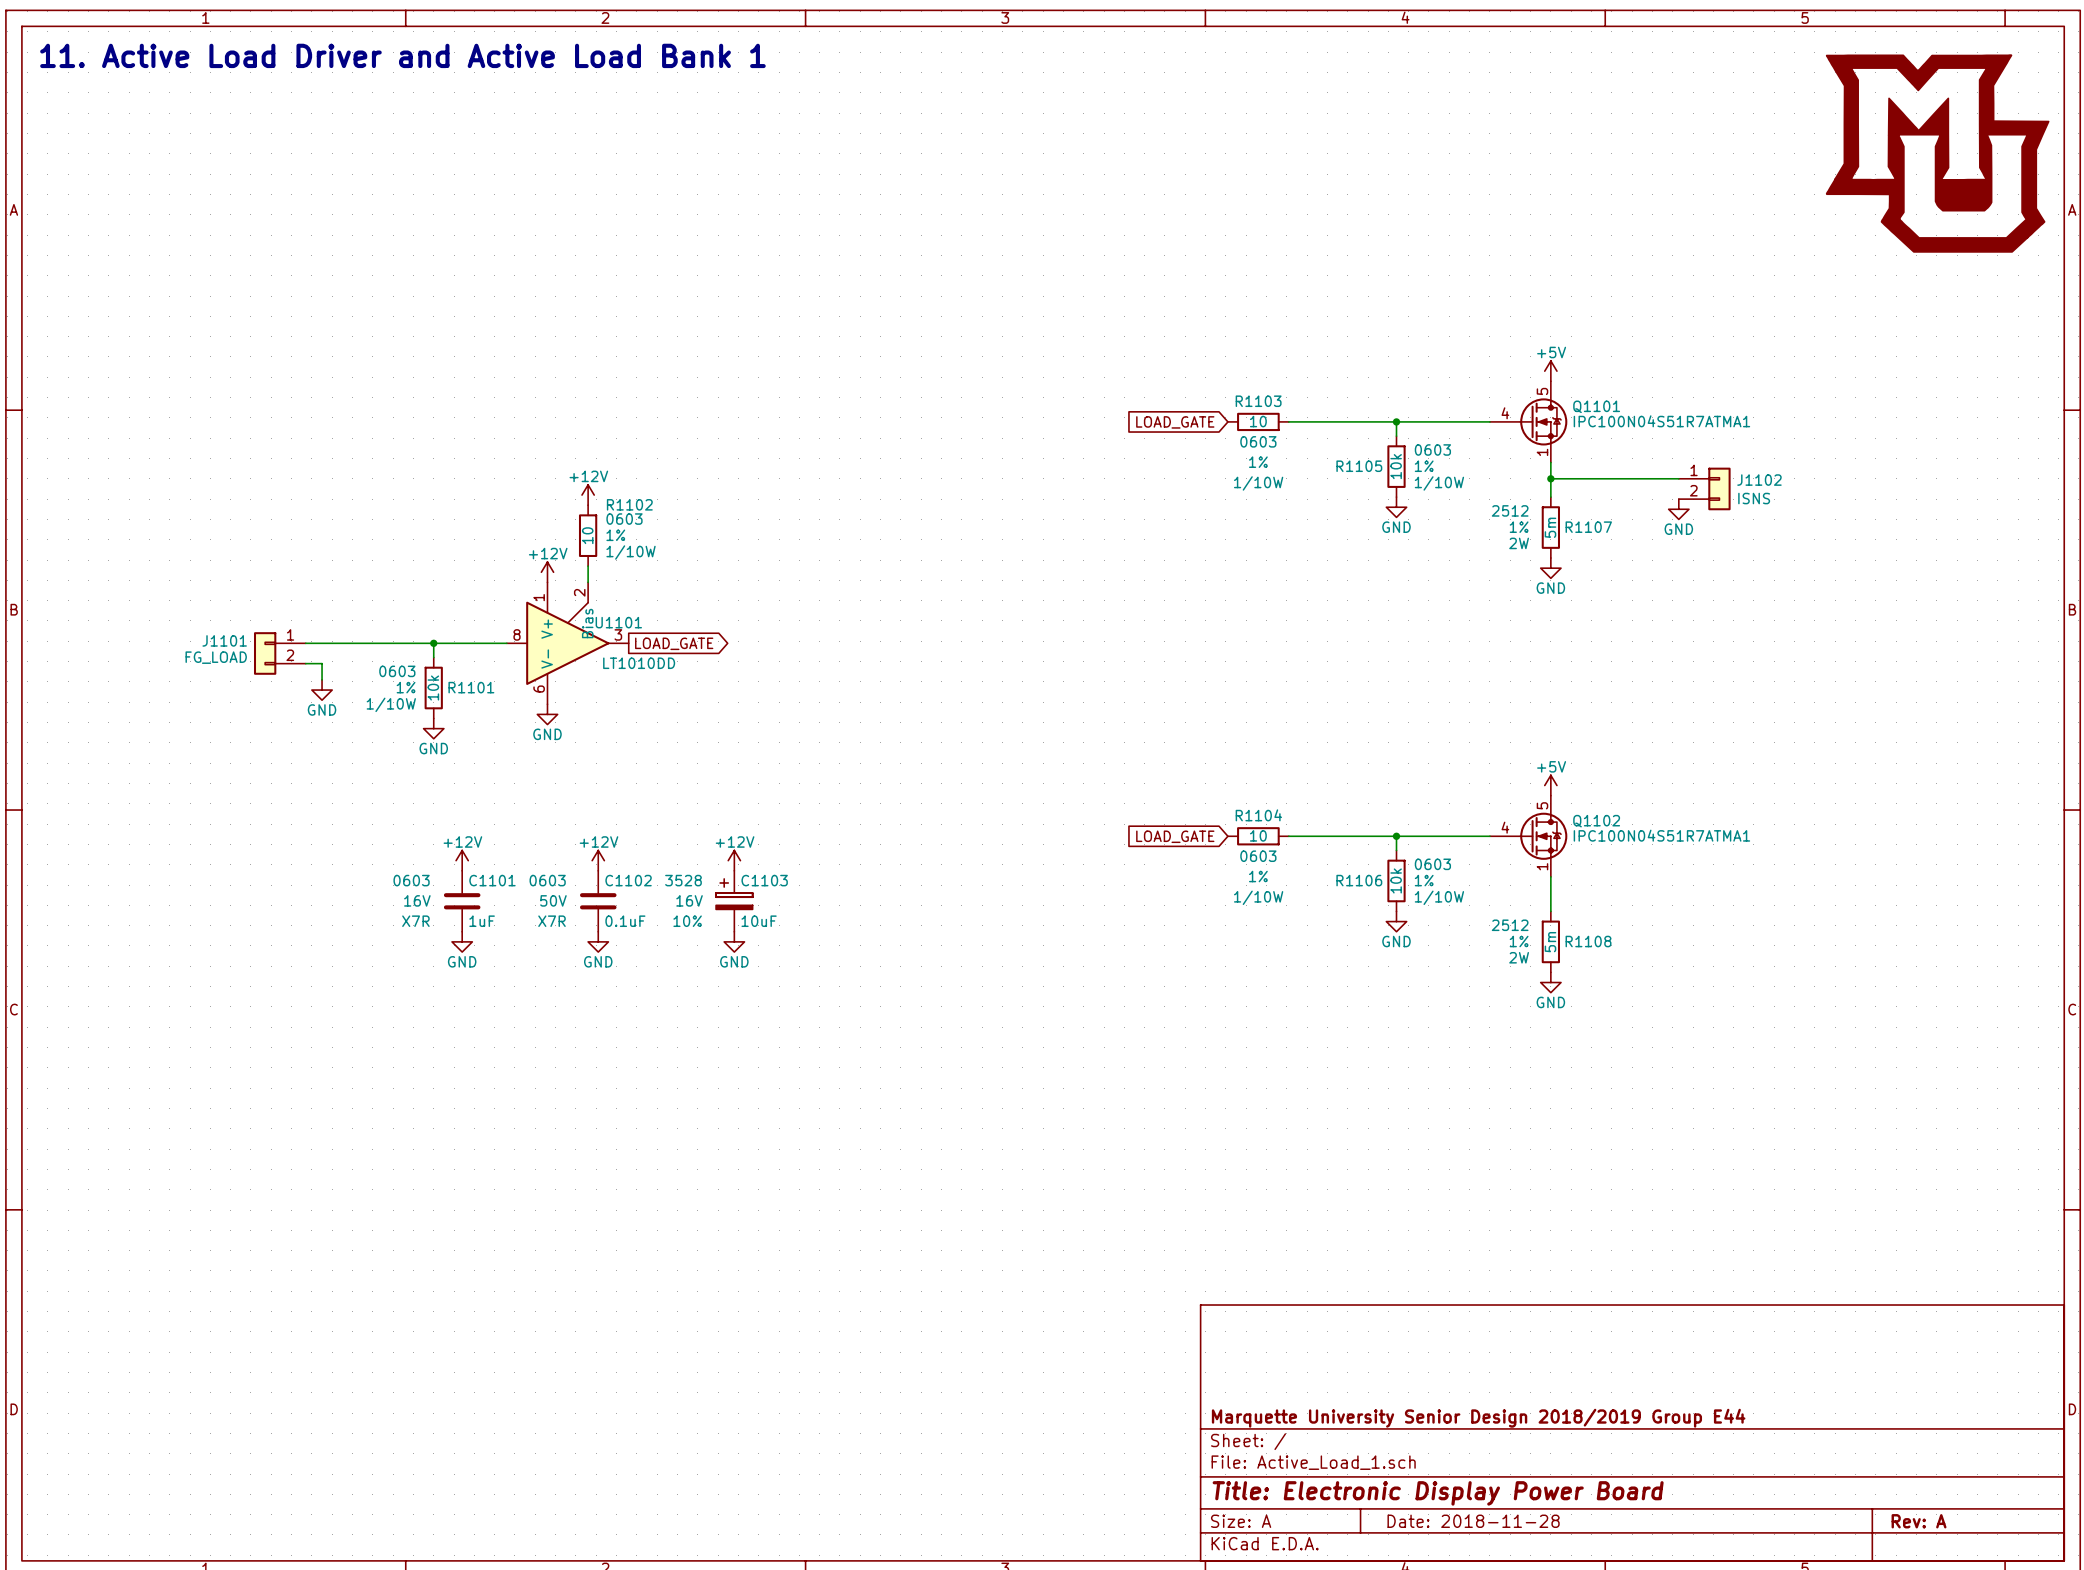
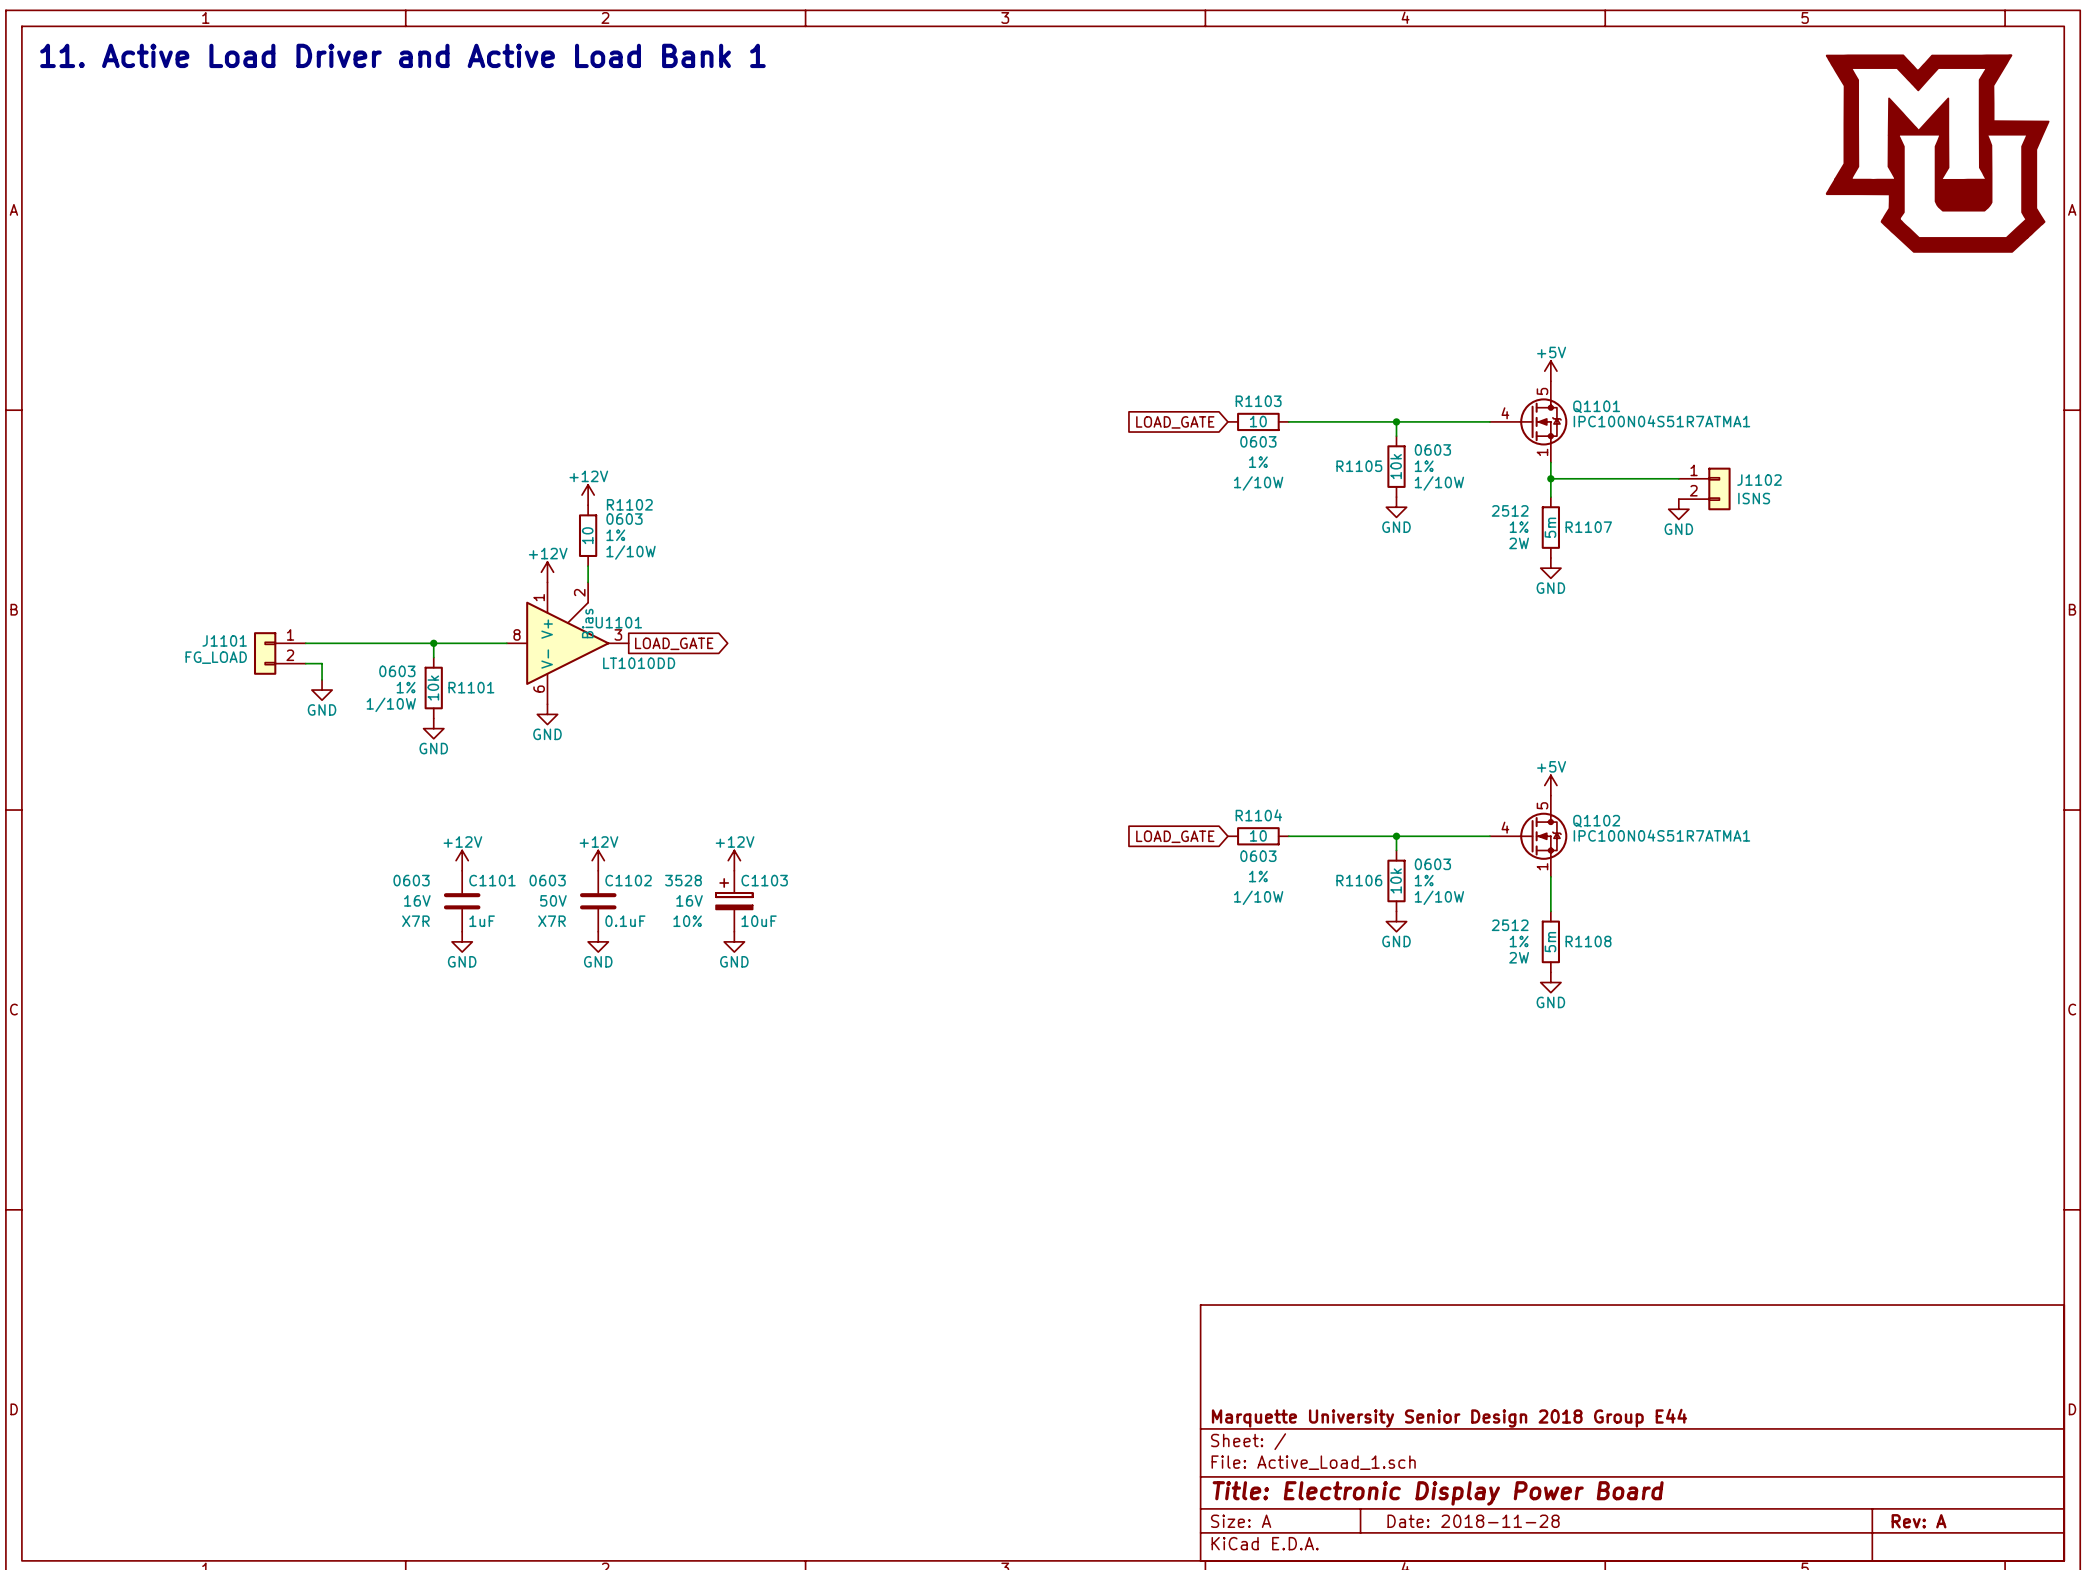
title block: Marquette University Senior Design 2018/2019 Group E44 (1478, 1418) -> Marquette University Senior Design 2018 Group E44 (1449, 1418)

